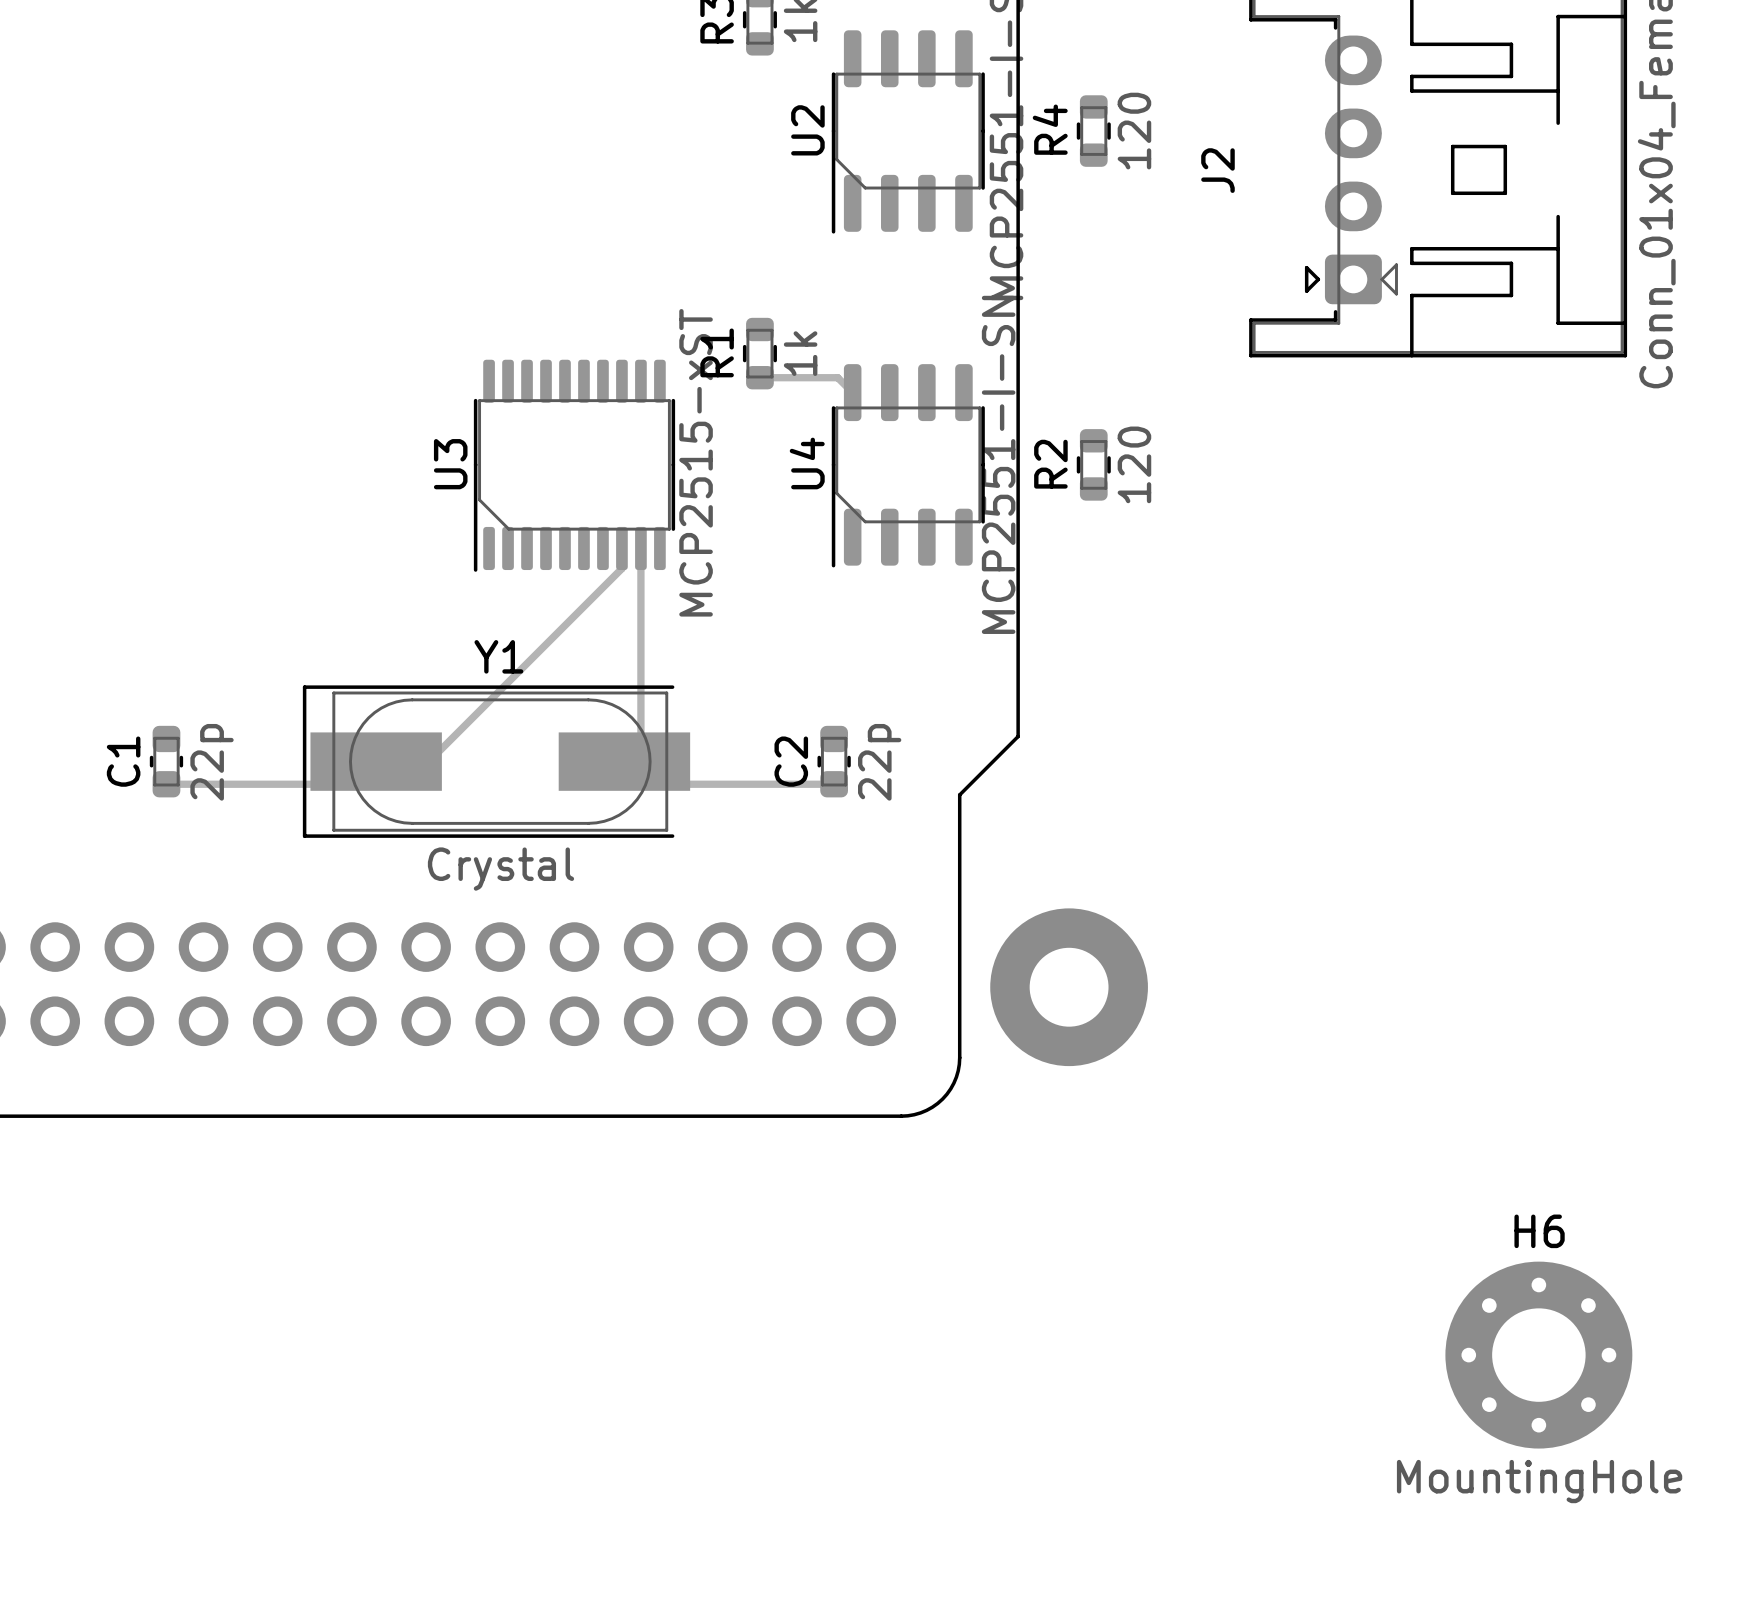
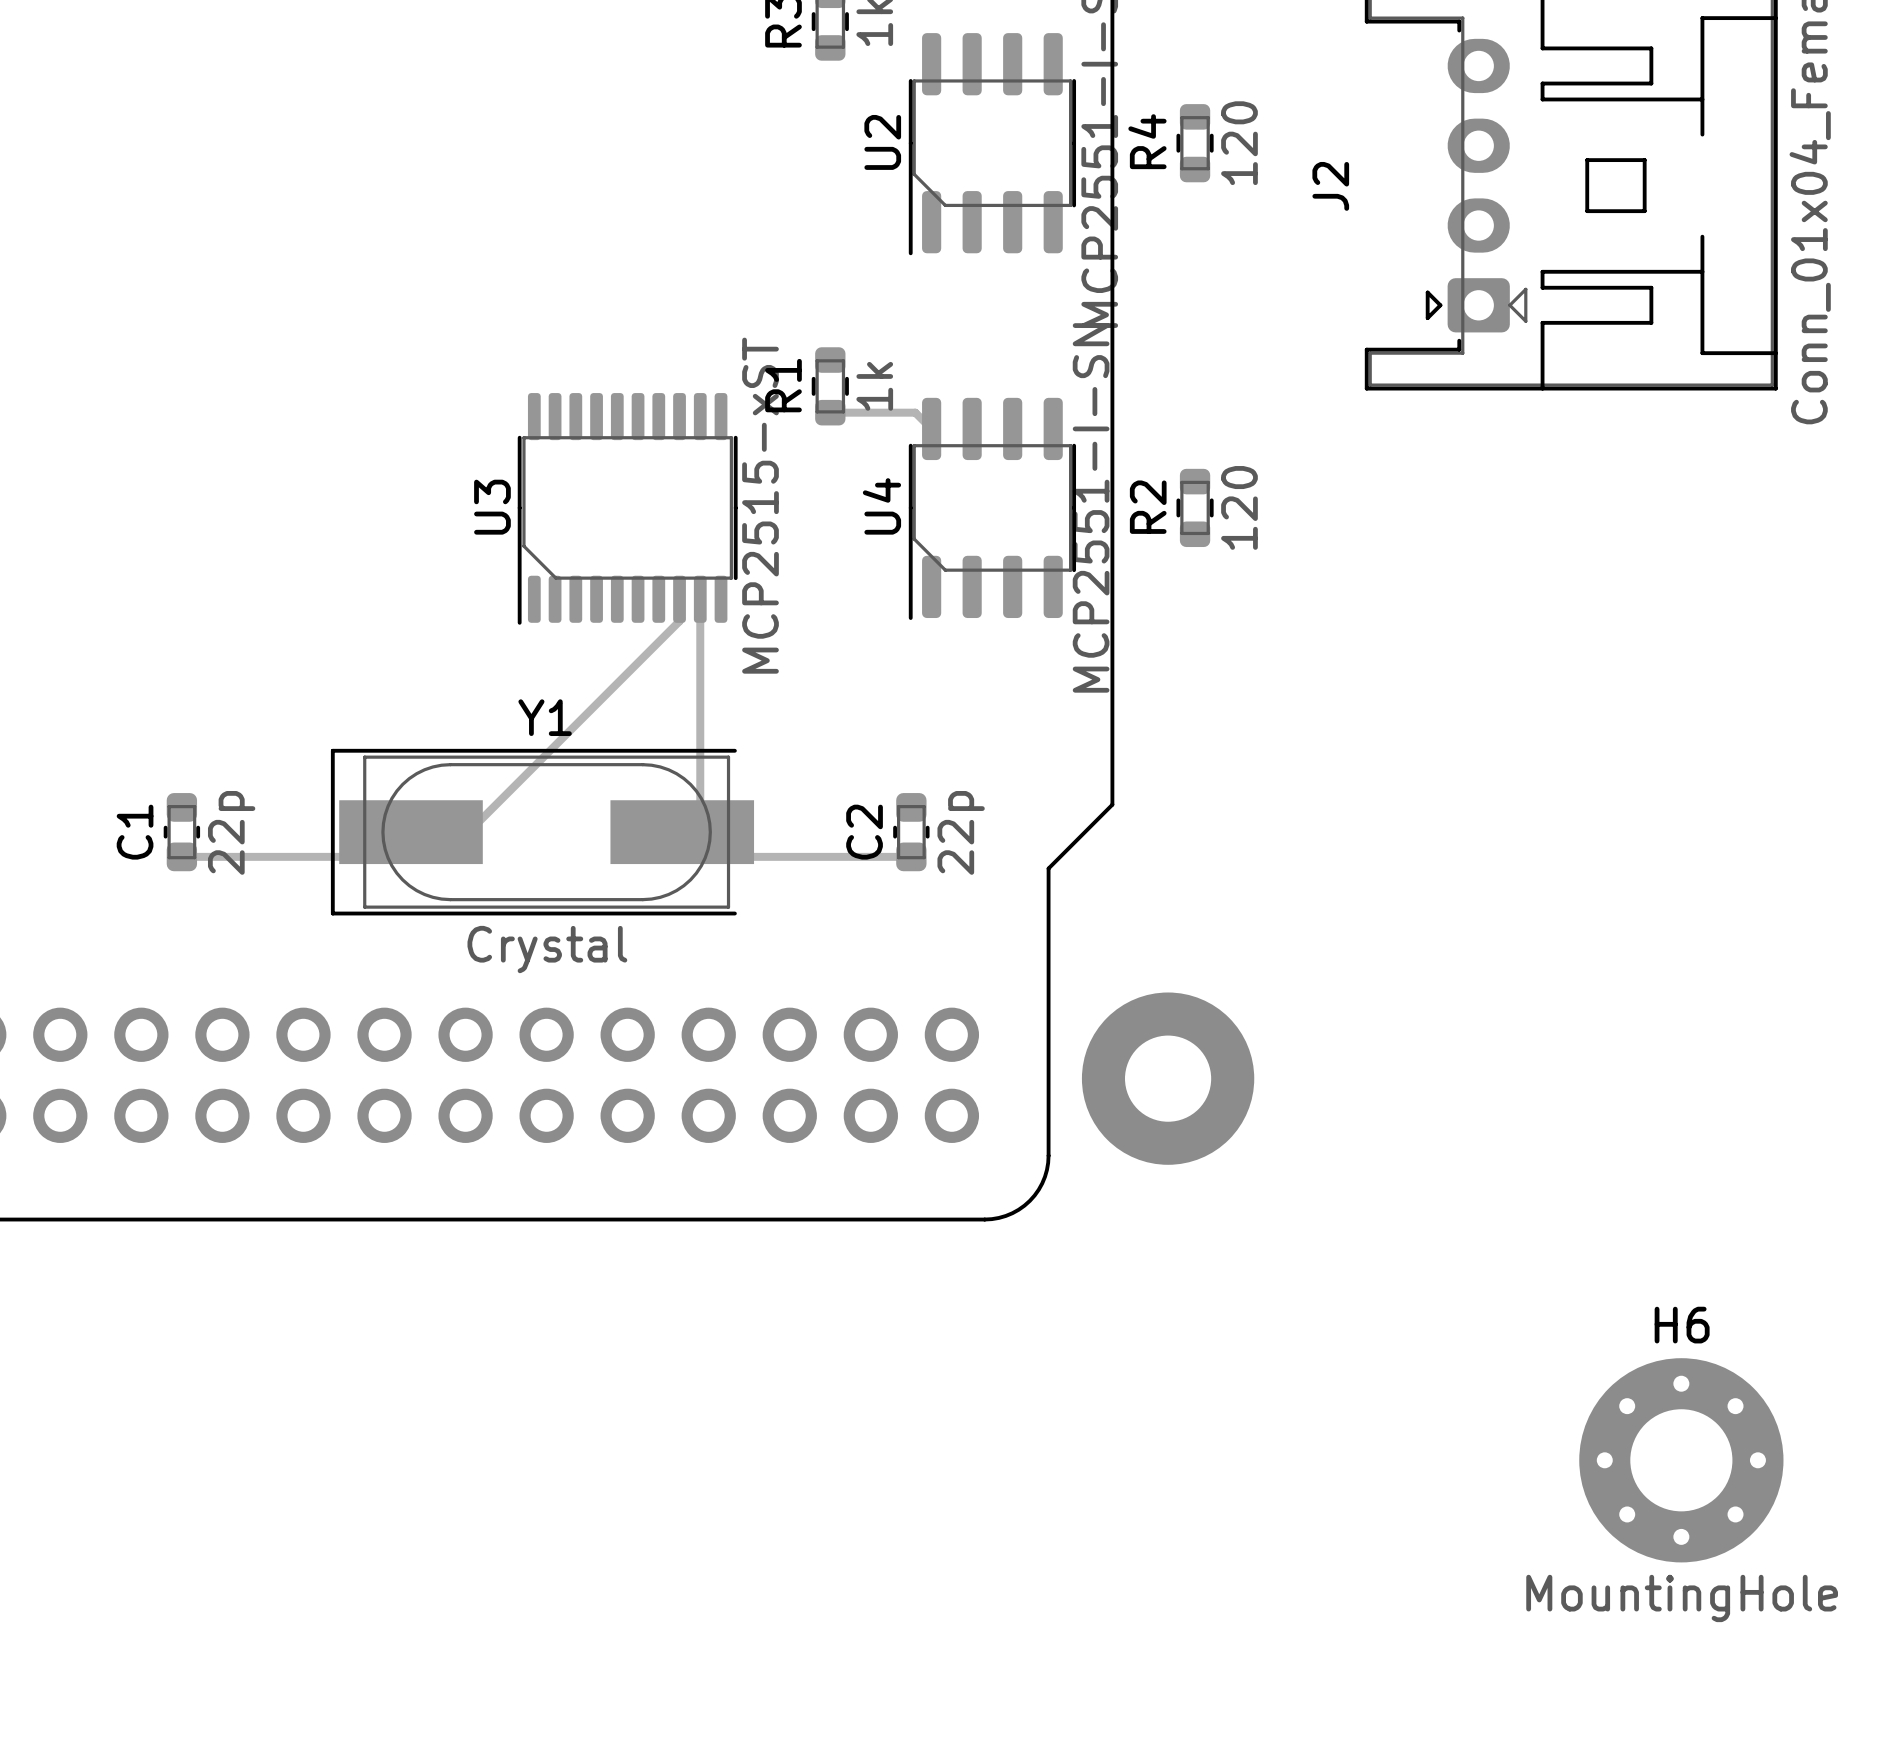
H6 position: (1538, 1355) -> (1681, 1460)

